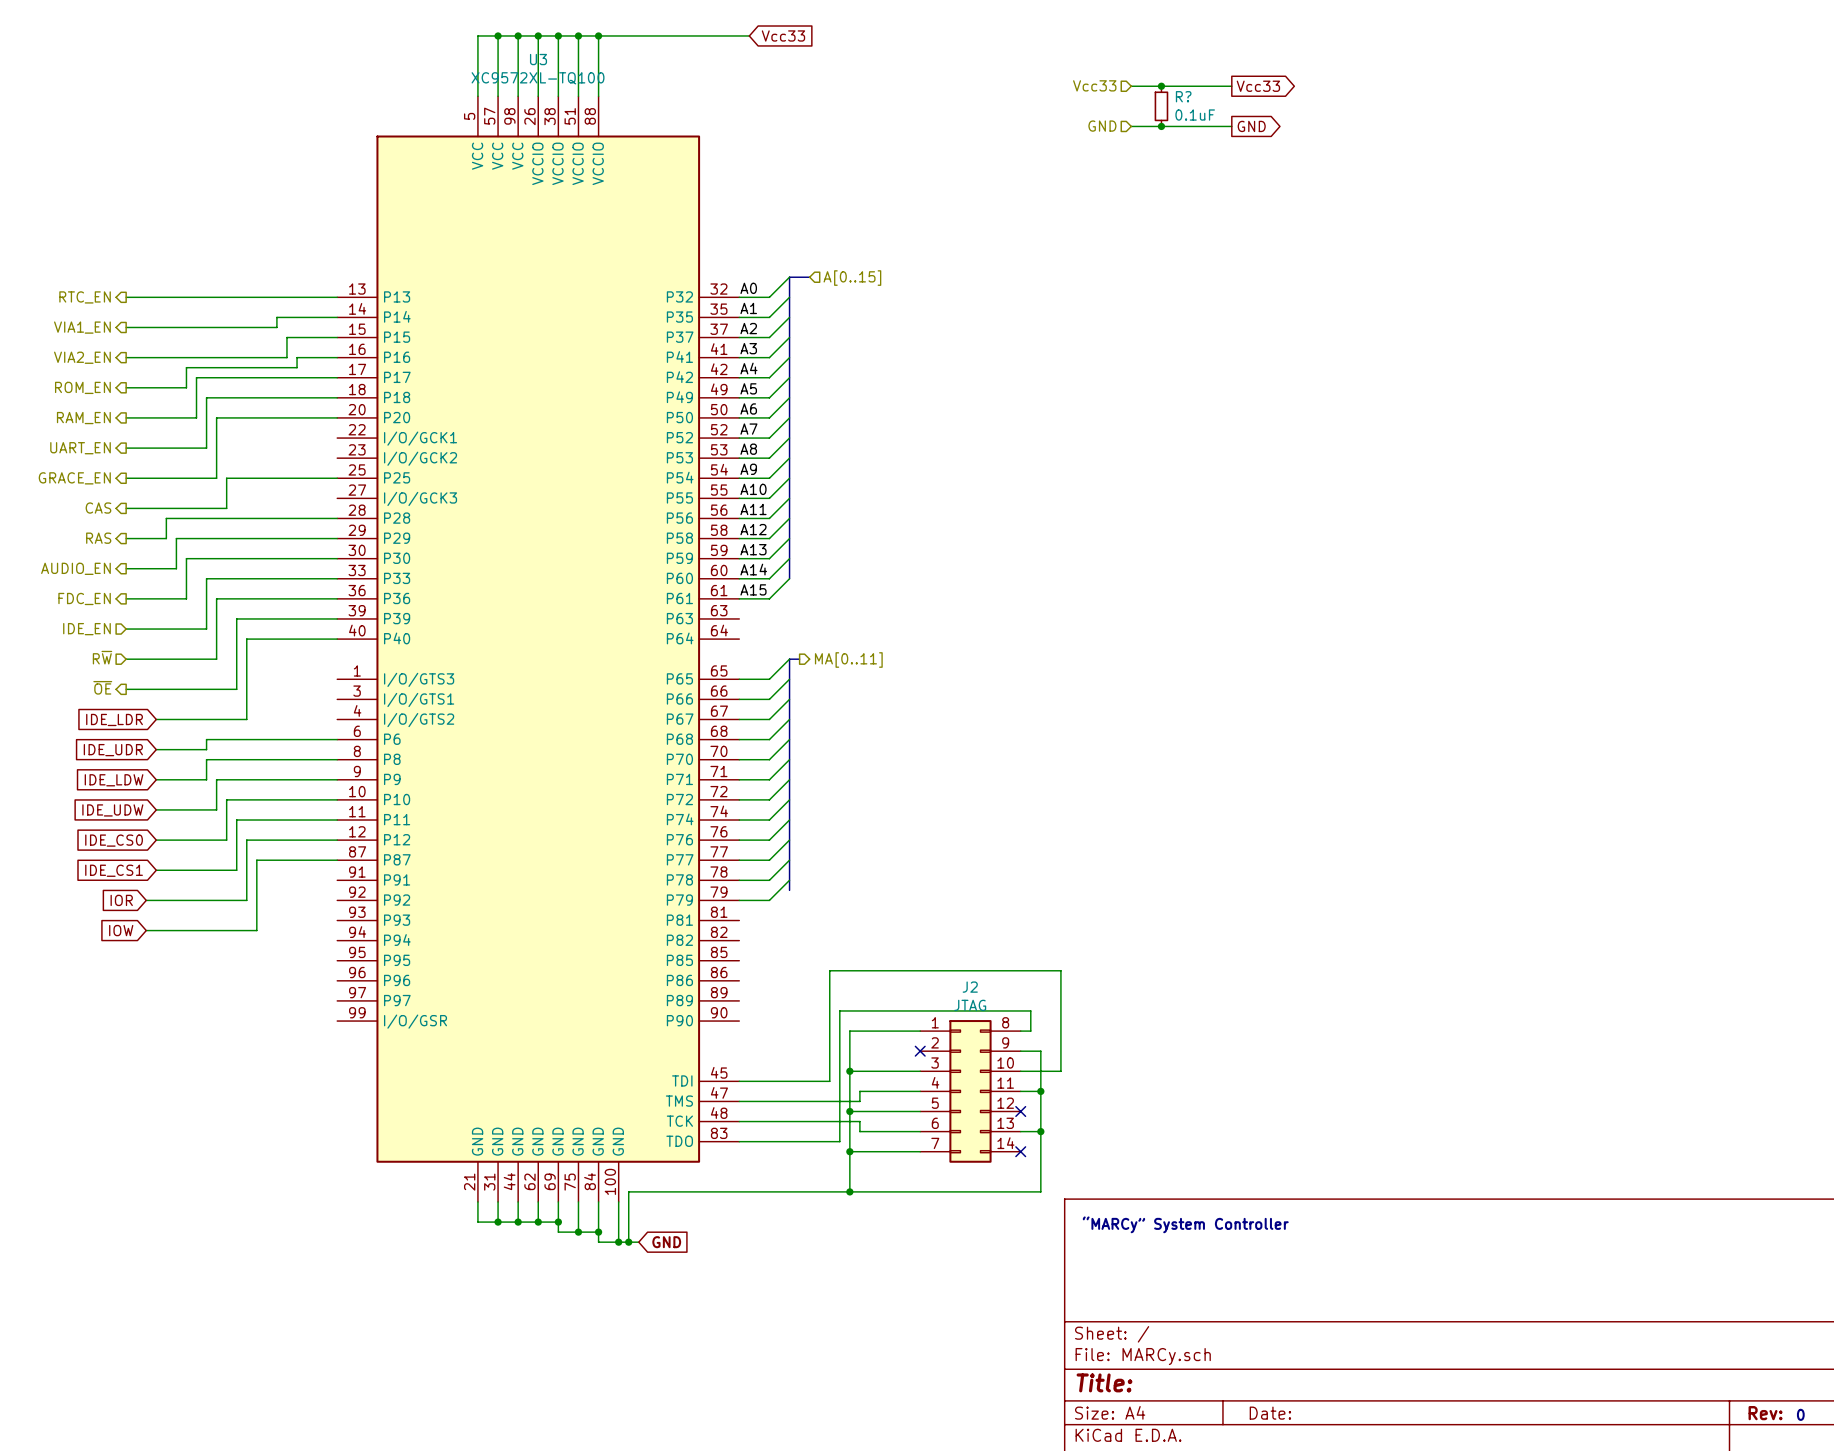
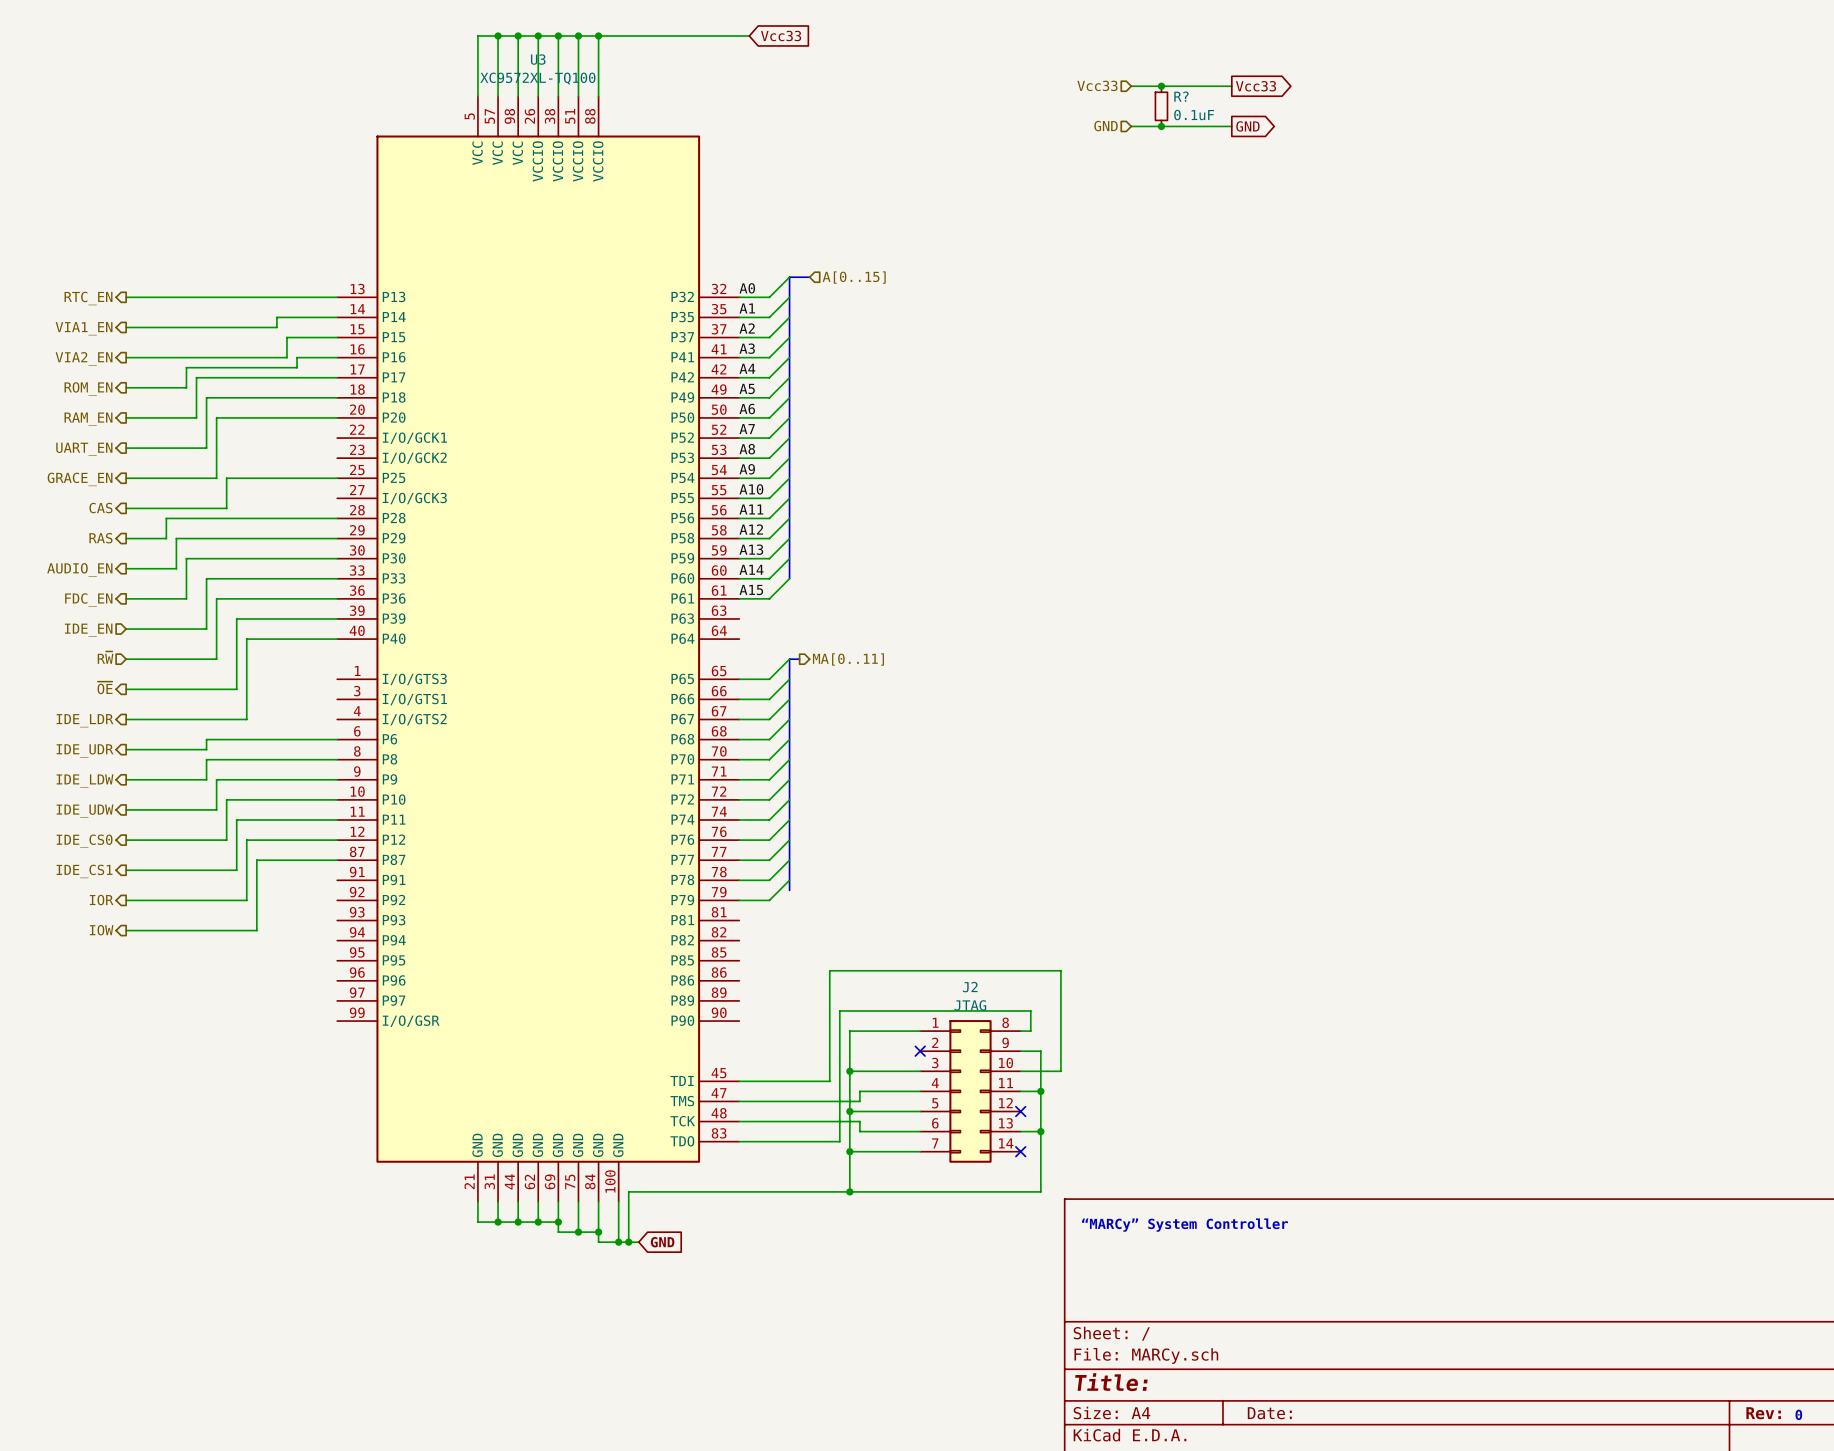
hierarchical label: none -> IDE_LDR (85, 720)
global label: IDE_LDR (114, 719) -> none
wire: none -> (126, 719) (156, 719)
hierarchical label: none -> IDE_UDR (85, 750)
wire: none -> (126, 749) (156, 749)
global label: IDE_UDR (113, 750) -> none
hierarchical label: none -> IDE_LDW (85, 781)
wire: none -> (126, 779) (156, 779)
global label: IDE_LDW (114, 780) -> none
wire: none -> (126, 809) (156, 809)
hierarchical label: none -> IDE_UDW (85, 811)
global label: IDE_UDW (112, 810) -> none
hierarchical label: none -> IDE_CS0 (84, 841)
global label: IDE_CS0 (114, 840) -> none
wire: none -> (126, 840) (156, 840)
hierarchical label: none -> IDE_CS1 (84, 871)
global label: IDE_CS1 (114, 870) -> none
wire: none -> (126, 870) (156, 870)
hierarchical label: none -> IOR (101, 900)
global label: IOR (121, 900) -> none
wire: none -> (126, 900) (146, 900)
hierarchical label: none -> IOW (101, 930)
global label: IOW (121, 930) -> none
wire: none -> (126, 930) (146, 930)

